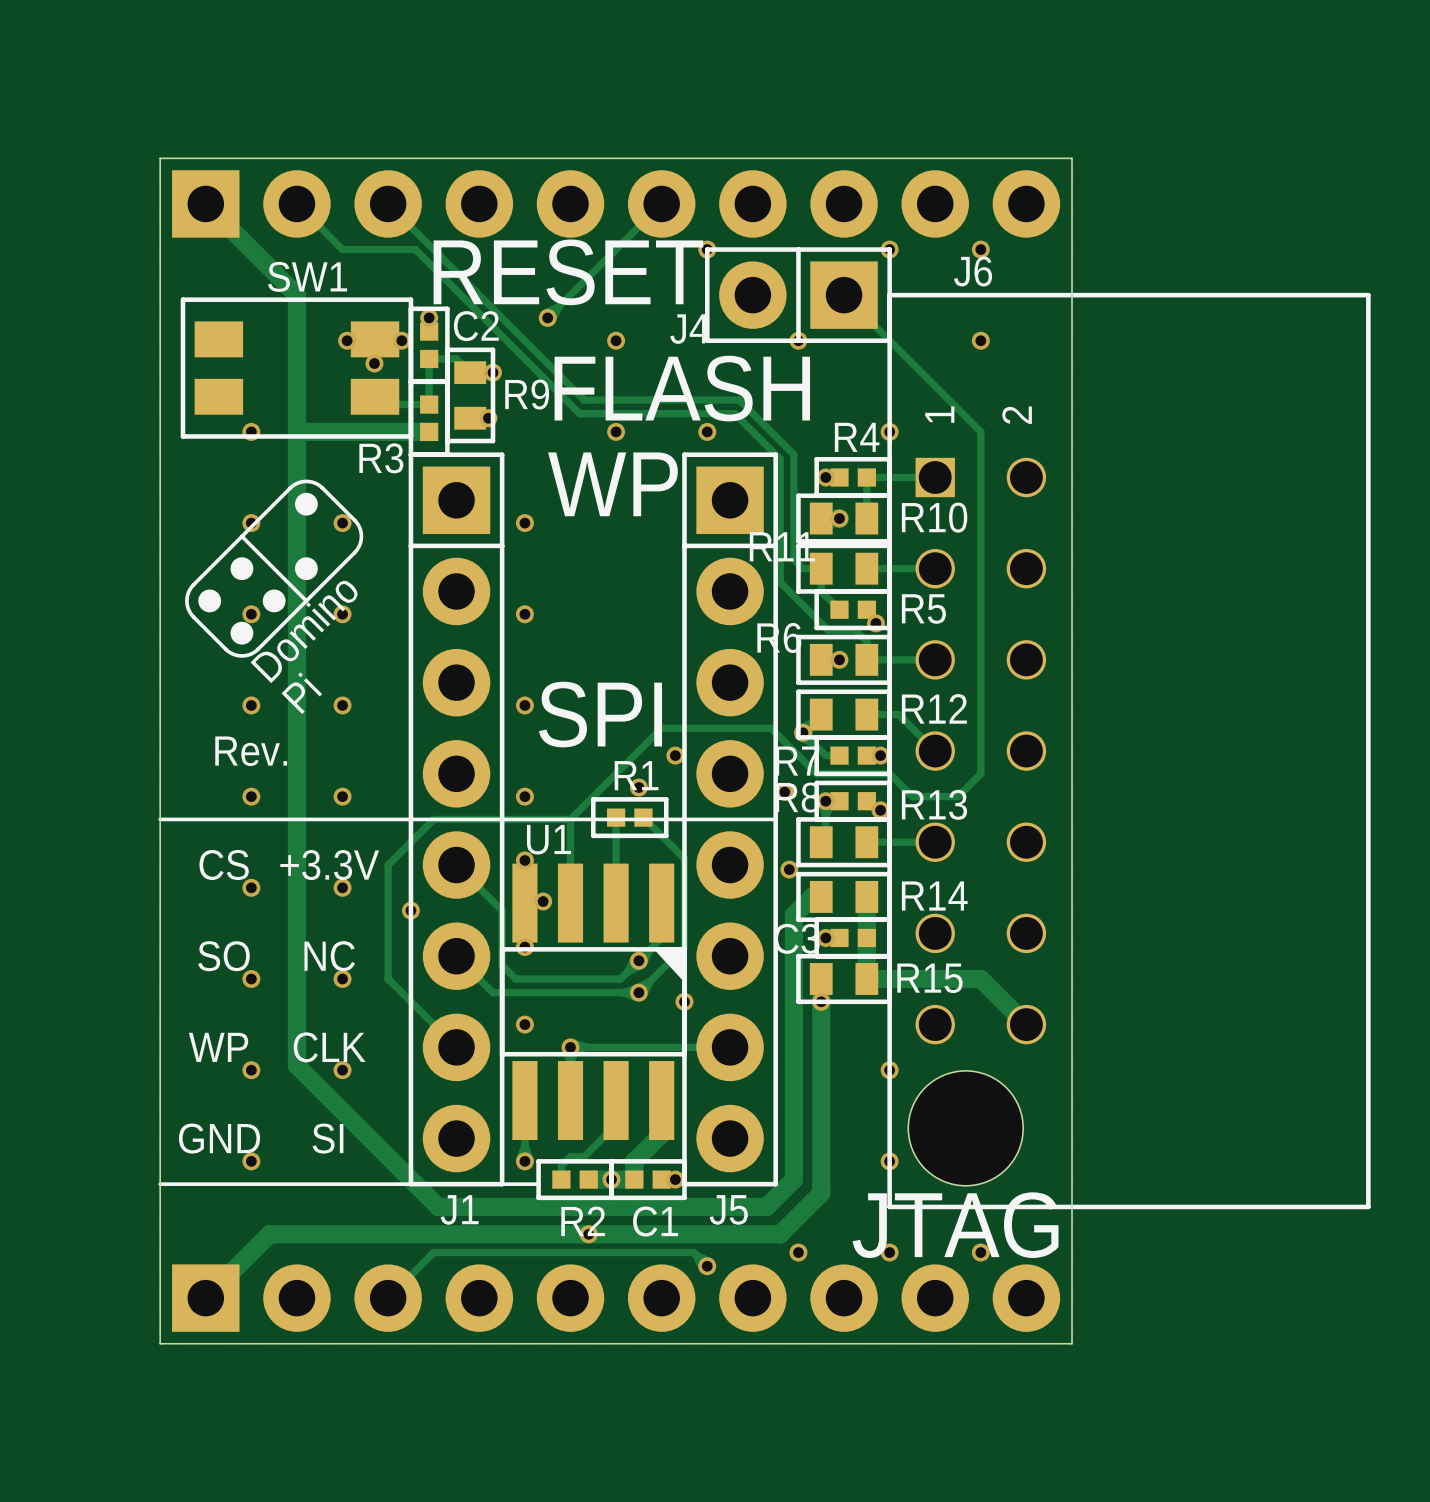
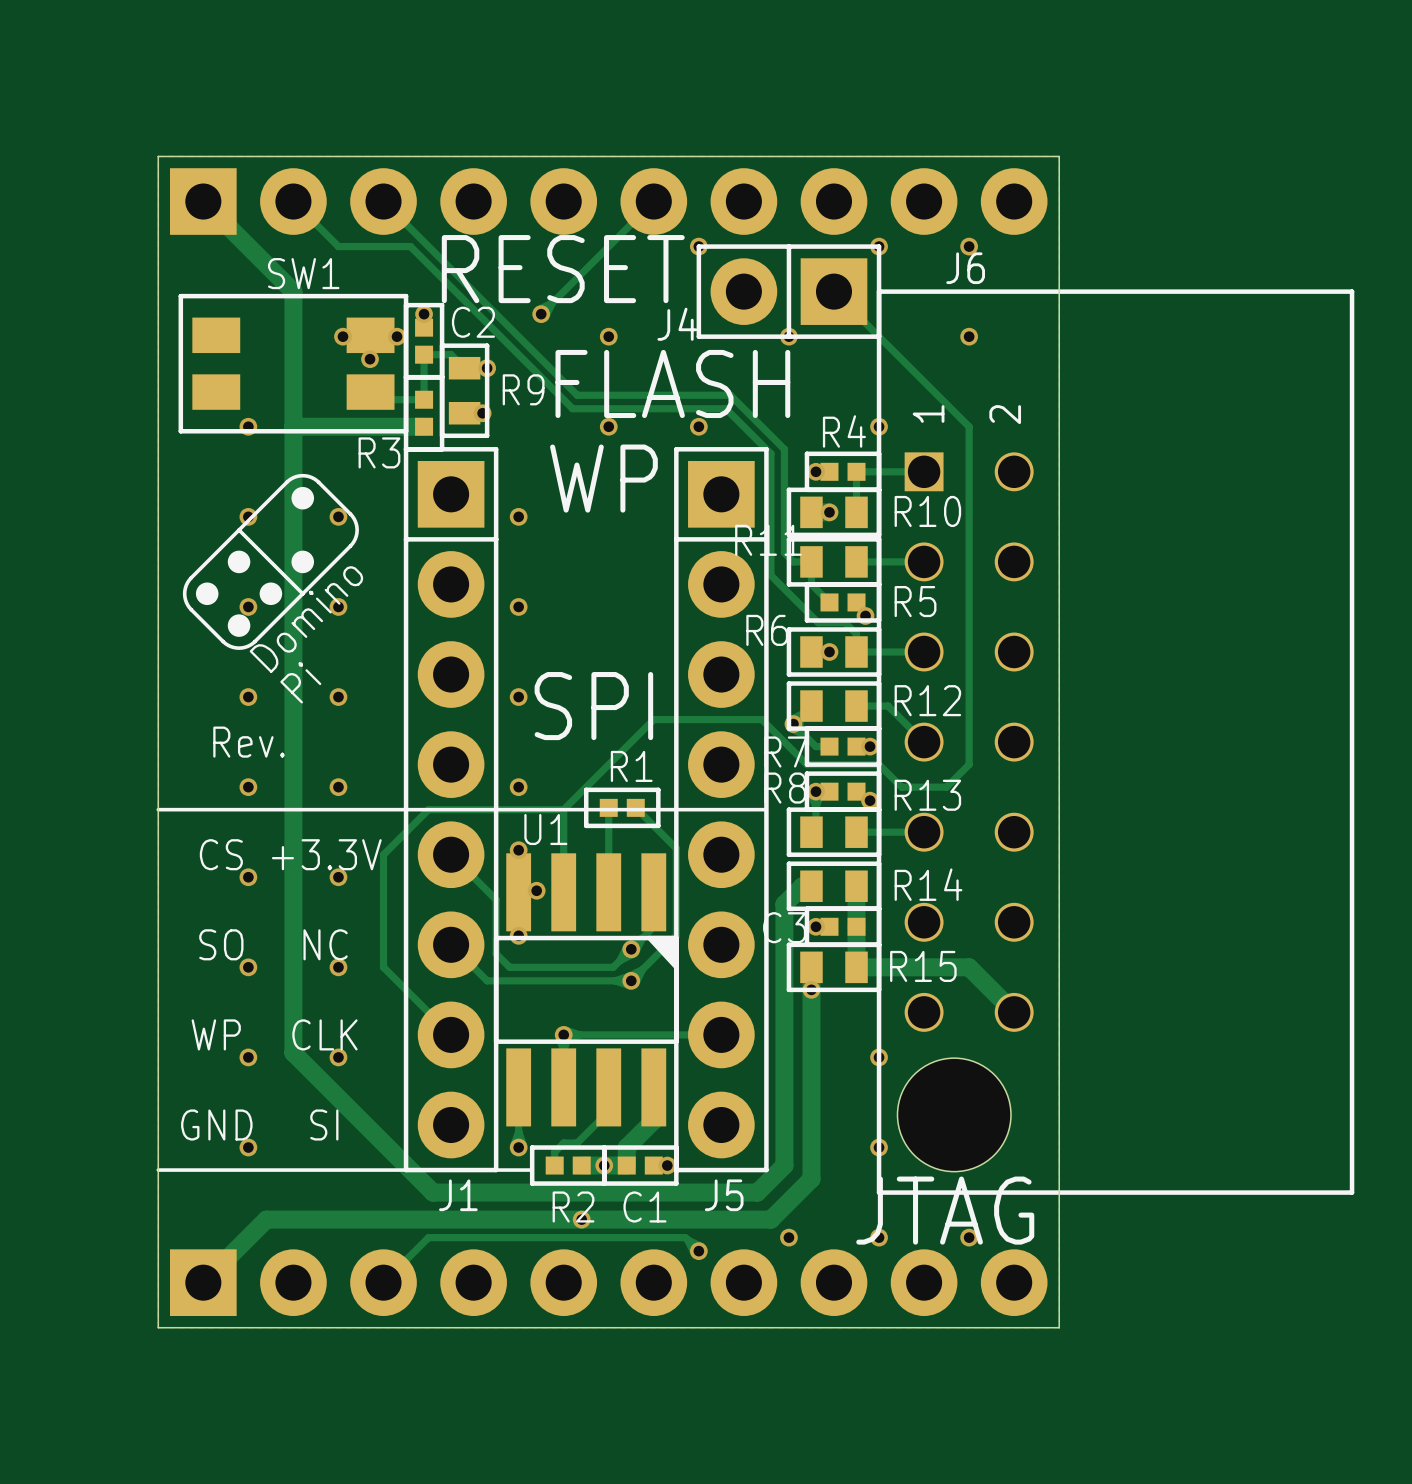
via: (675, 755) -> none
via: (638, 787) -> none
via: (784, 792) -> none
via: (789, 869) -> none
via: (410, 910) -> none
via: (684, 1001) -> none
via: (524, 1024) -> none

